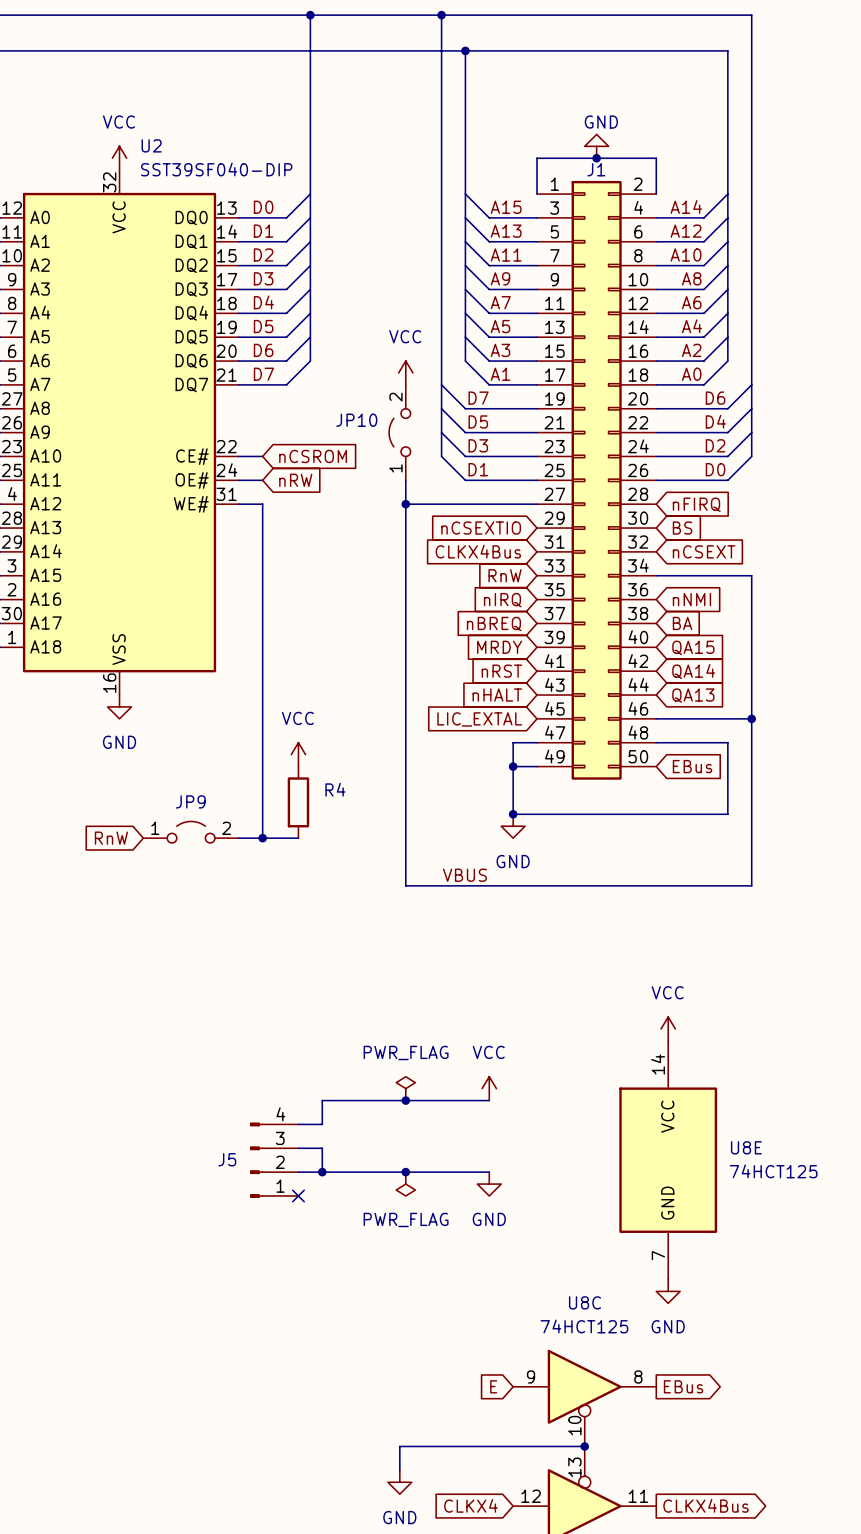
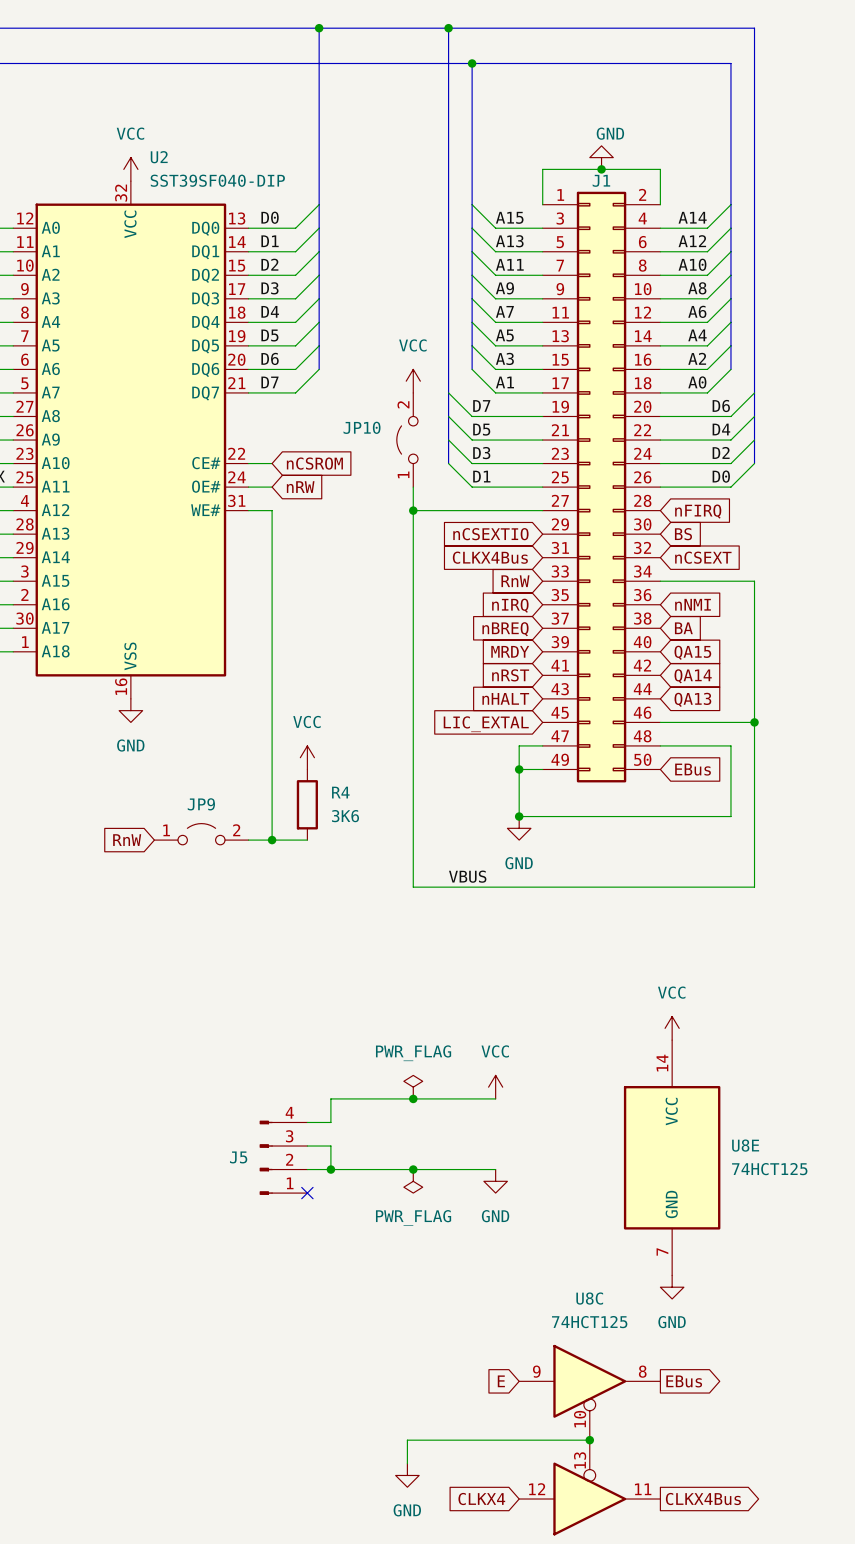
R4 value: none -> 3K6 (345, 816)

